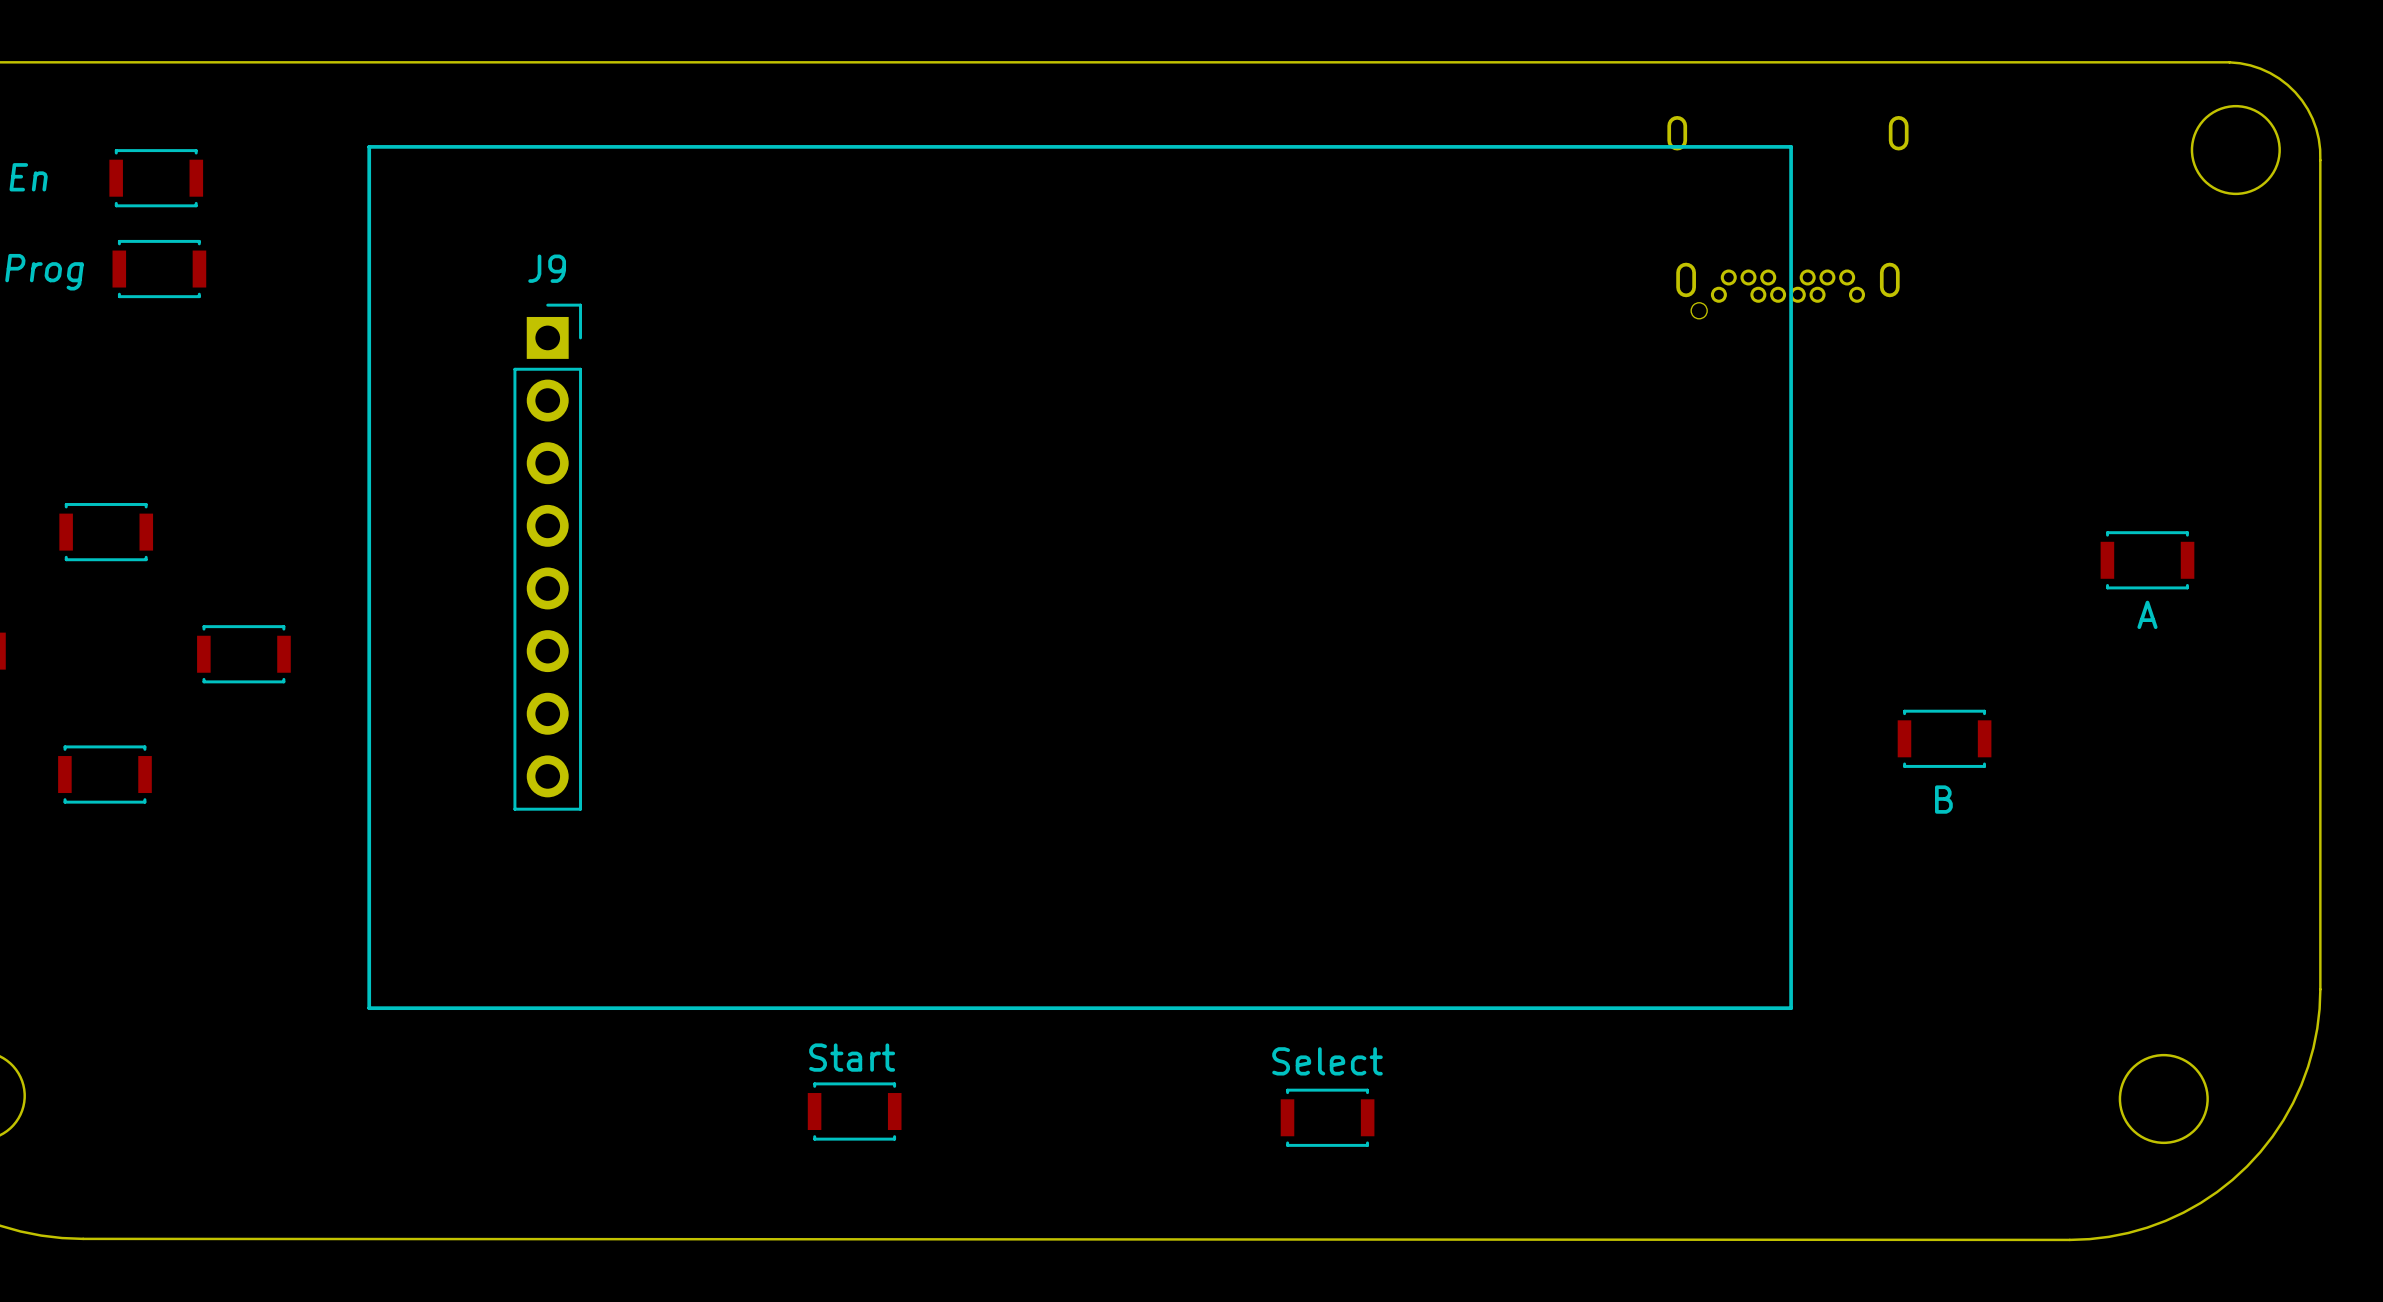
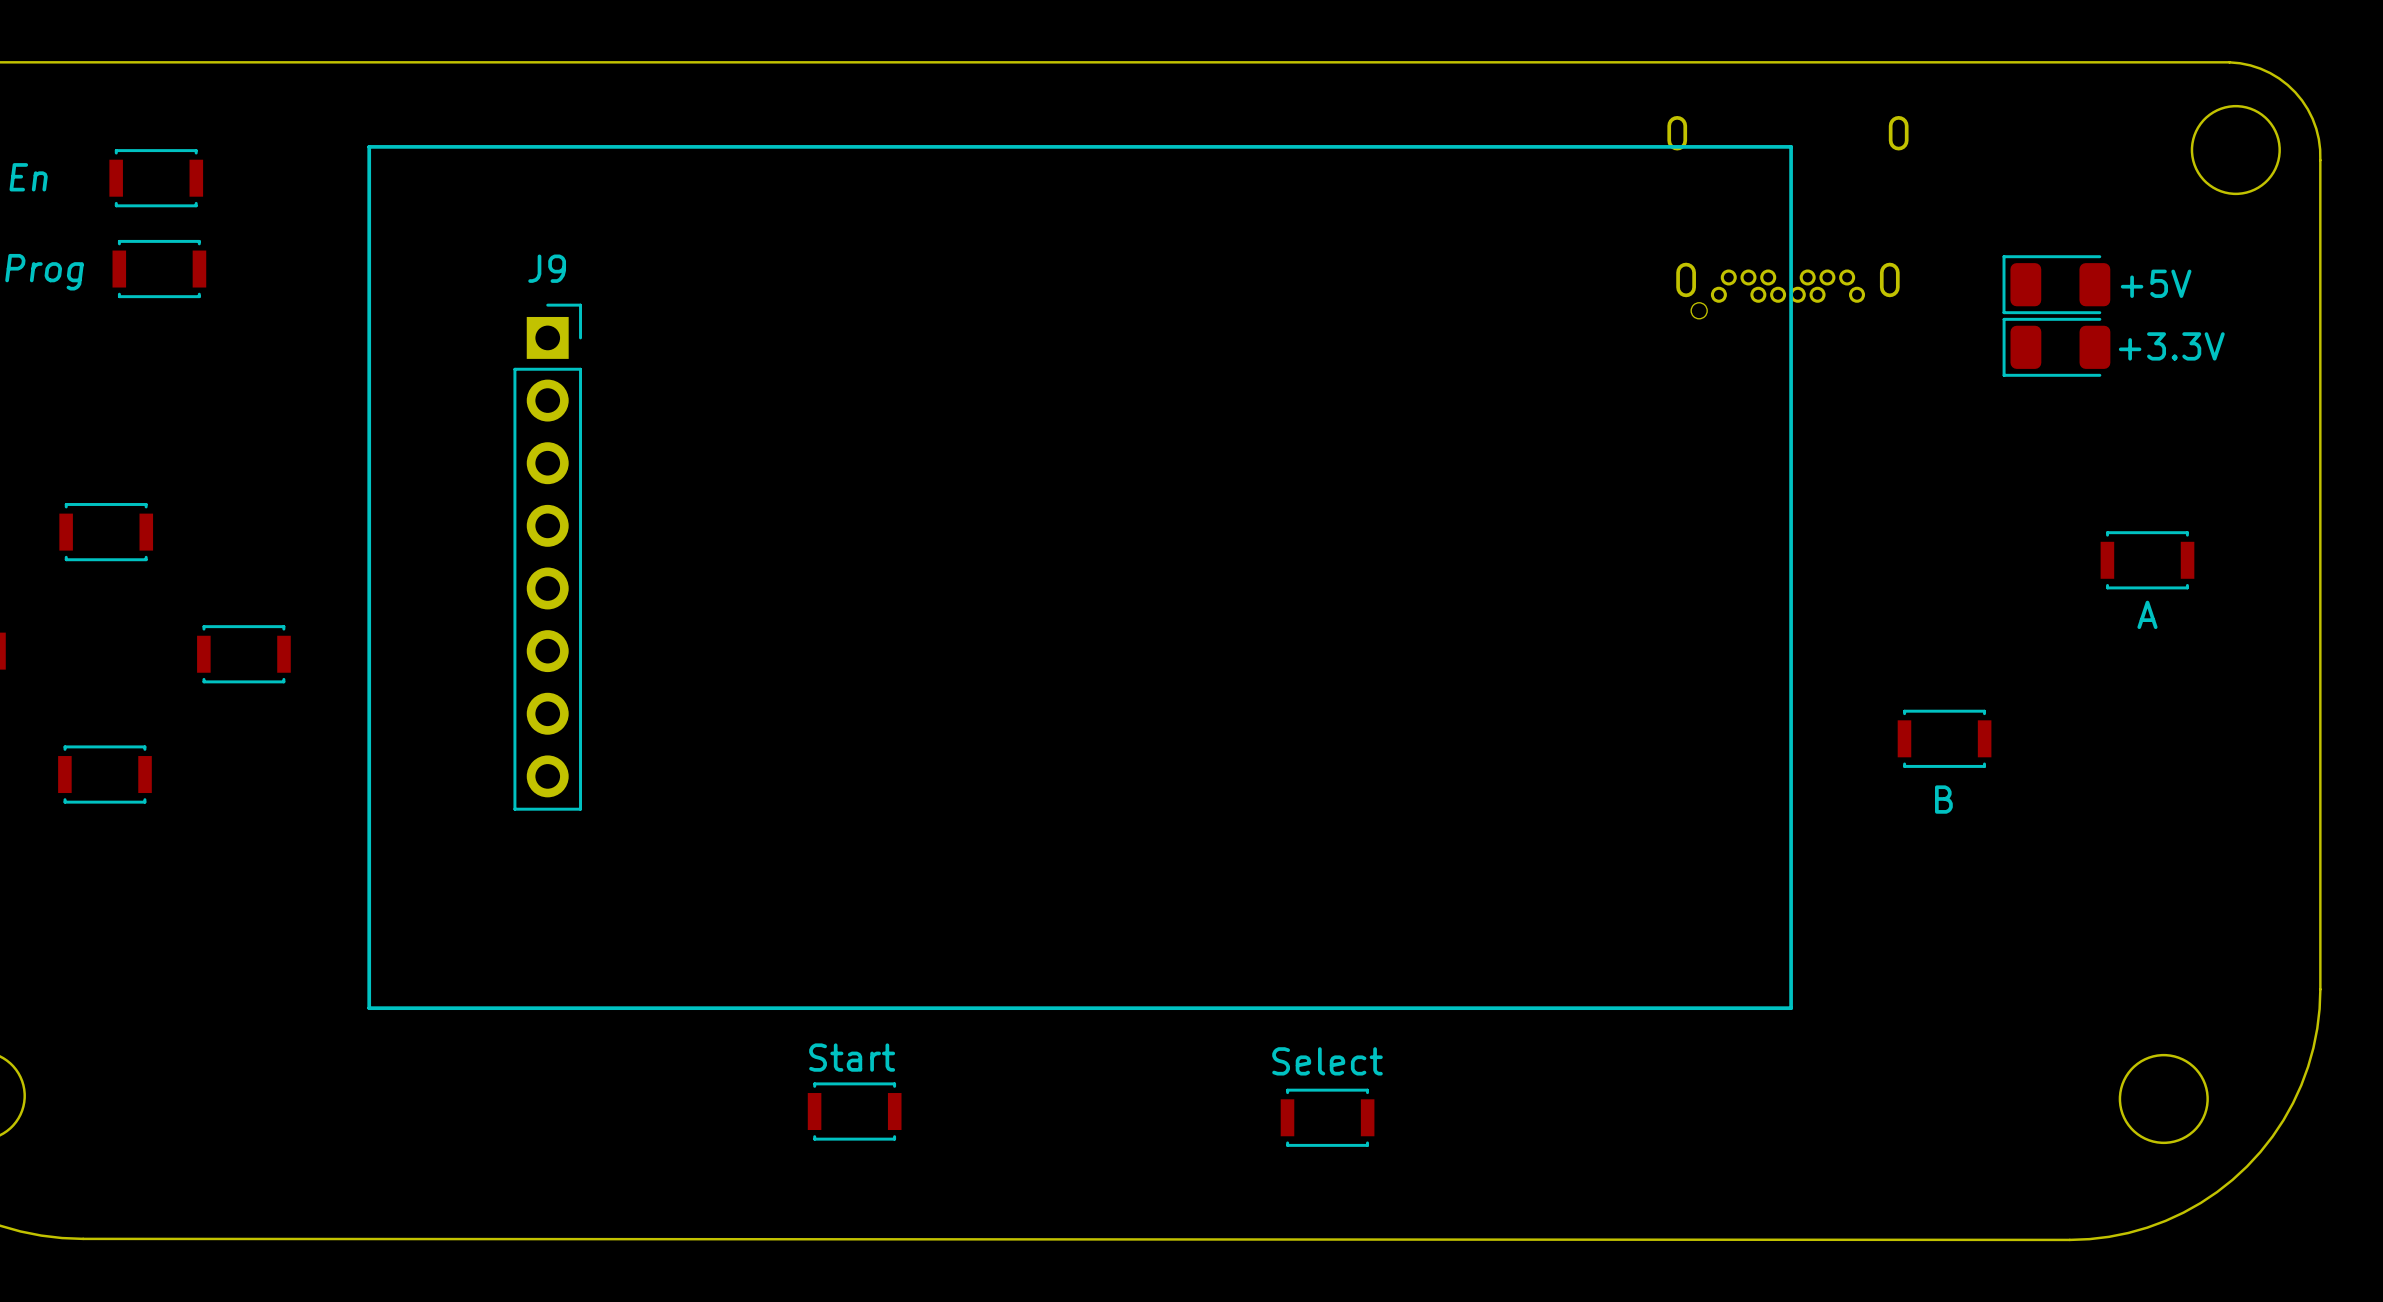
part: none -> (2056, 284)
part: none -> (2056, 347)

